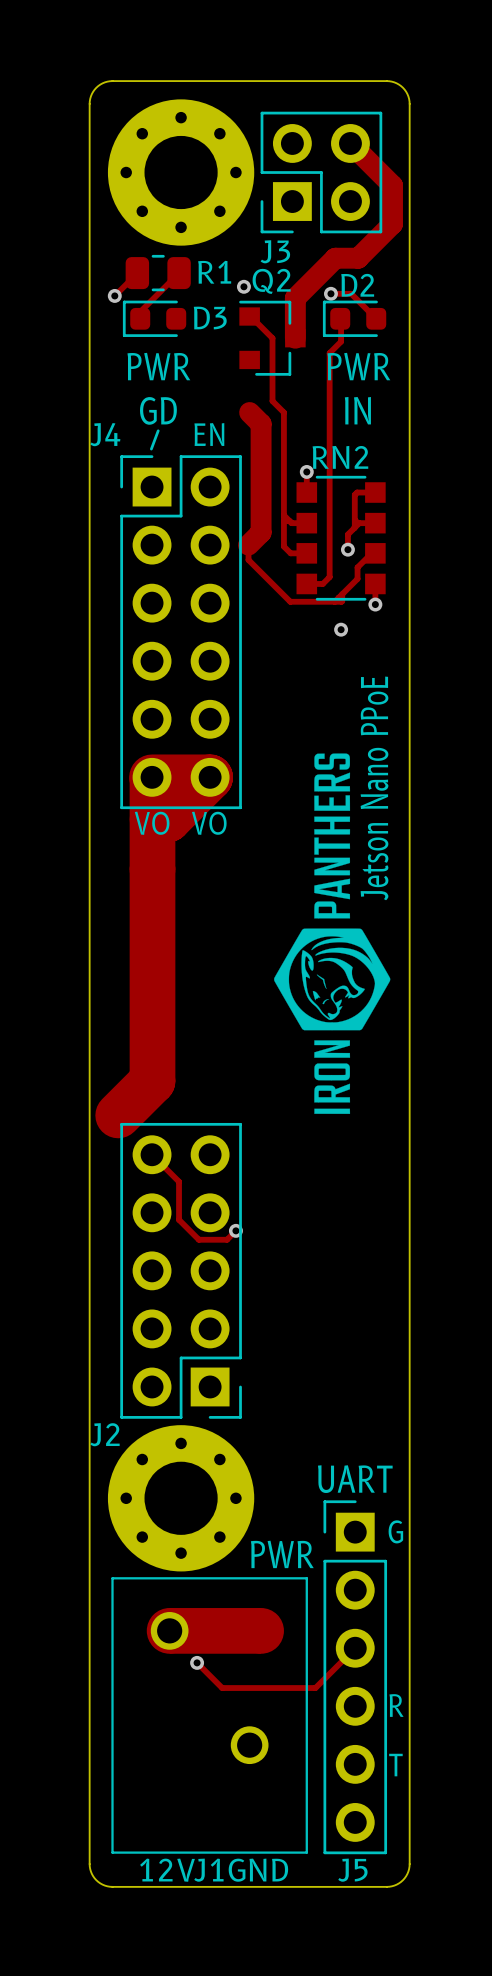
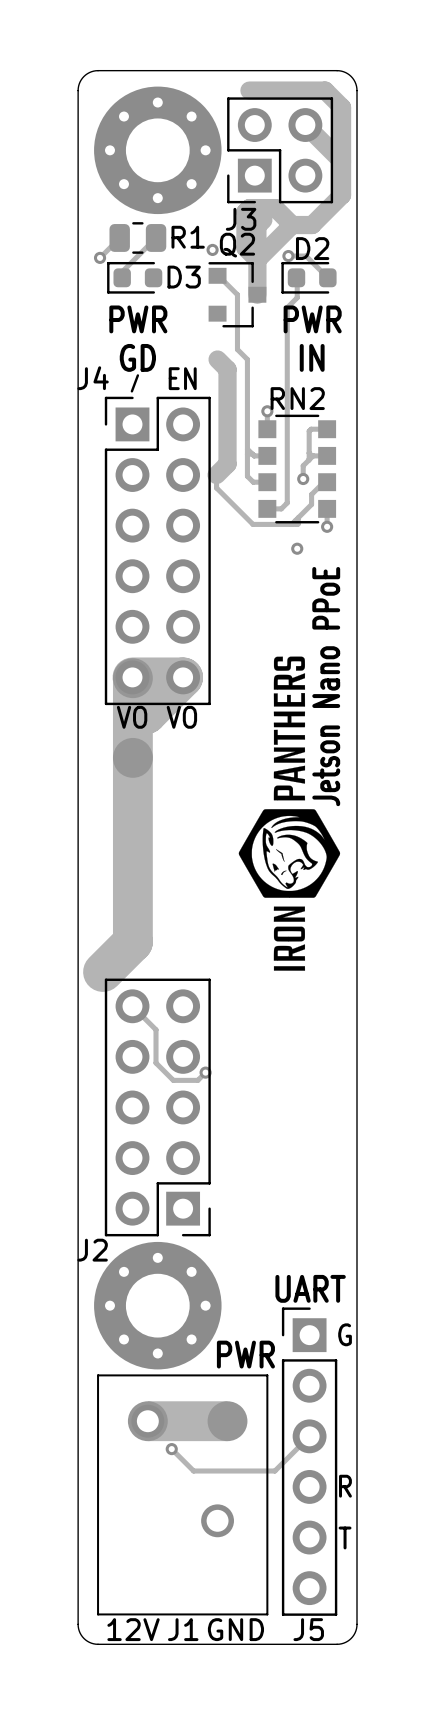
track: none -> (249, 90) (325, 90) (342, 107) (342, 161)
track: none -> (263, 220) (257, 226) (257, 259) (245, 247) (245, 212) (249, 208) (275, 208) (292, 225)

